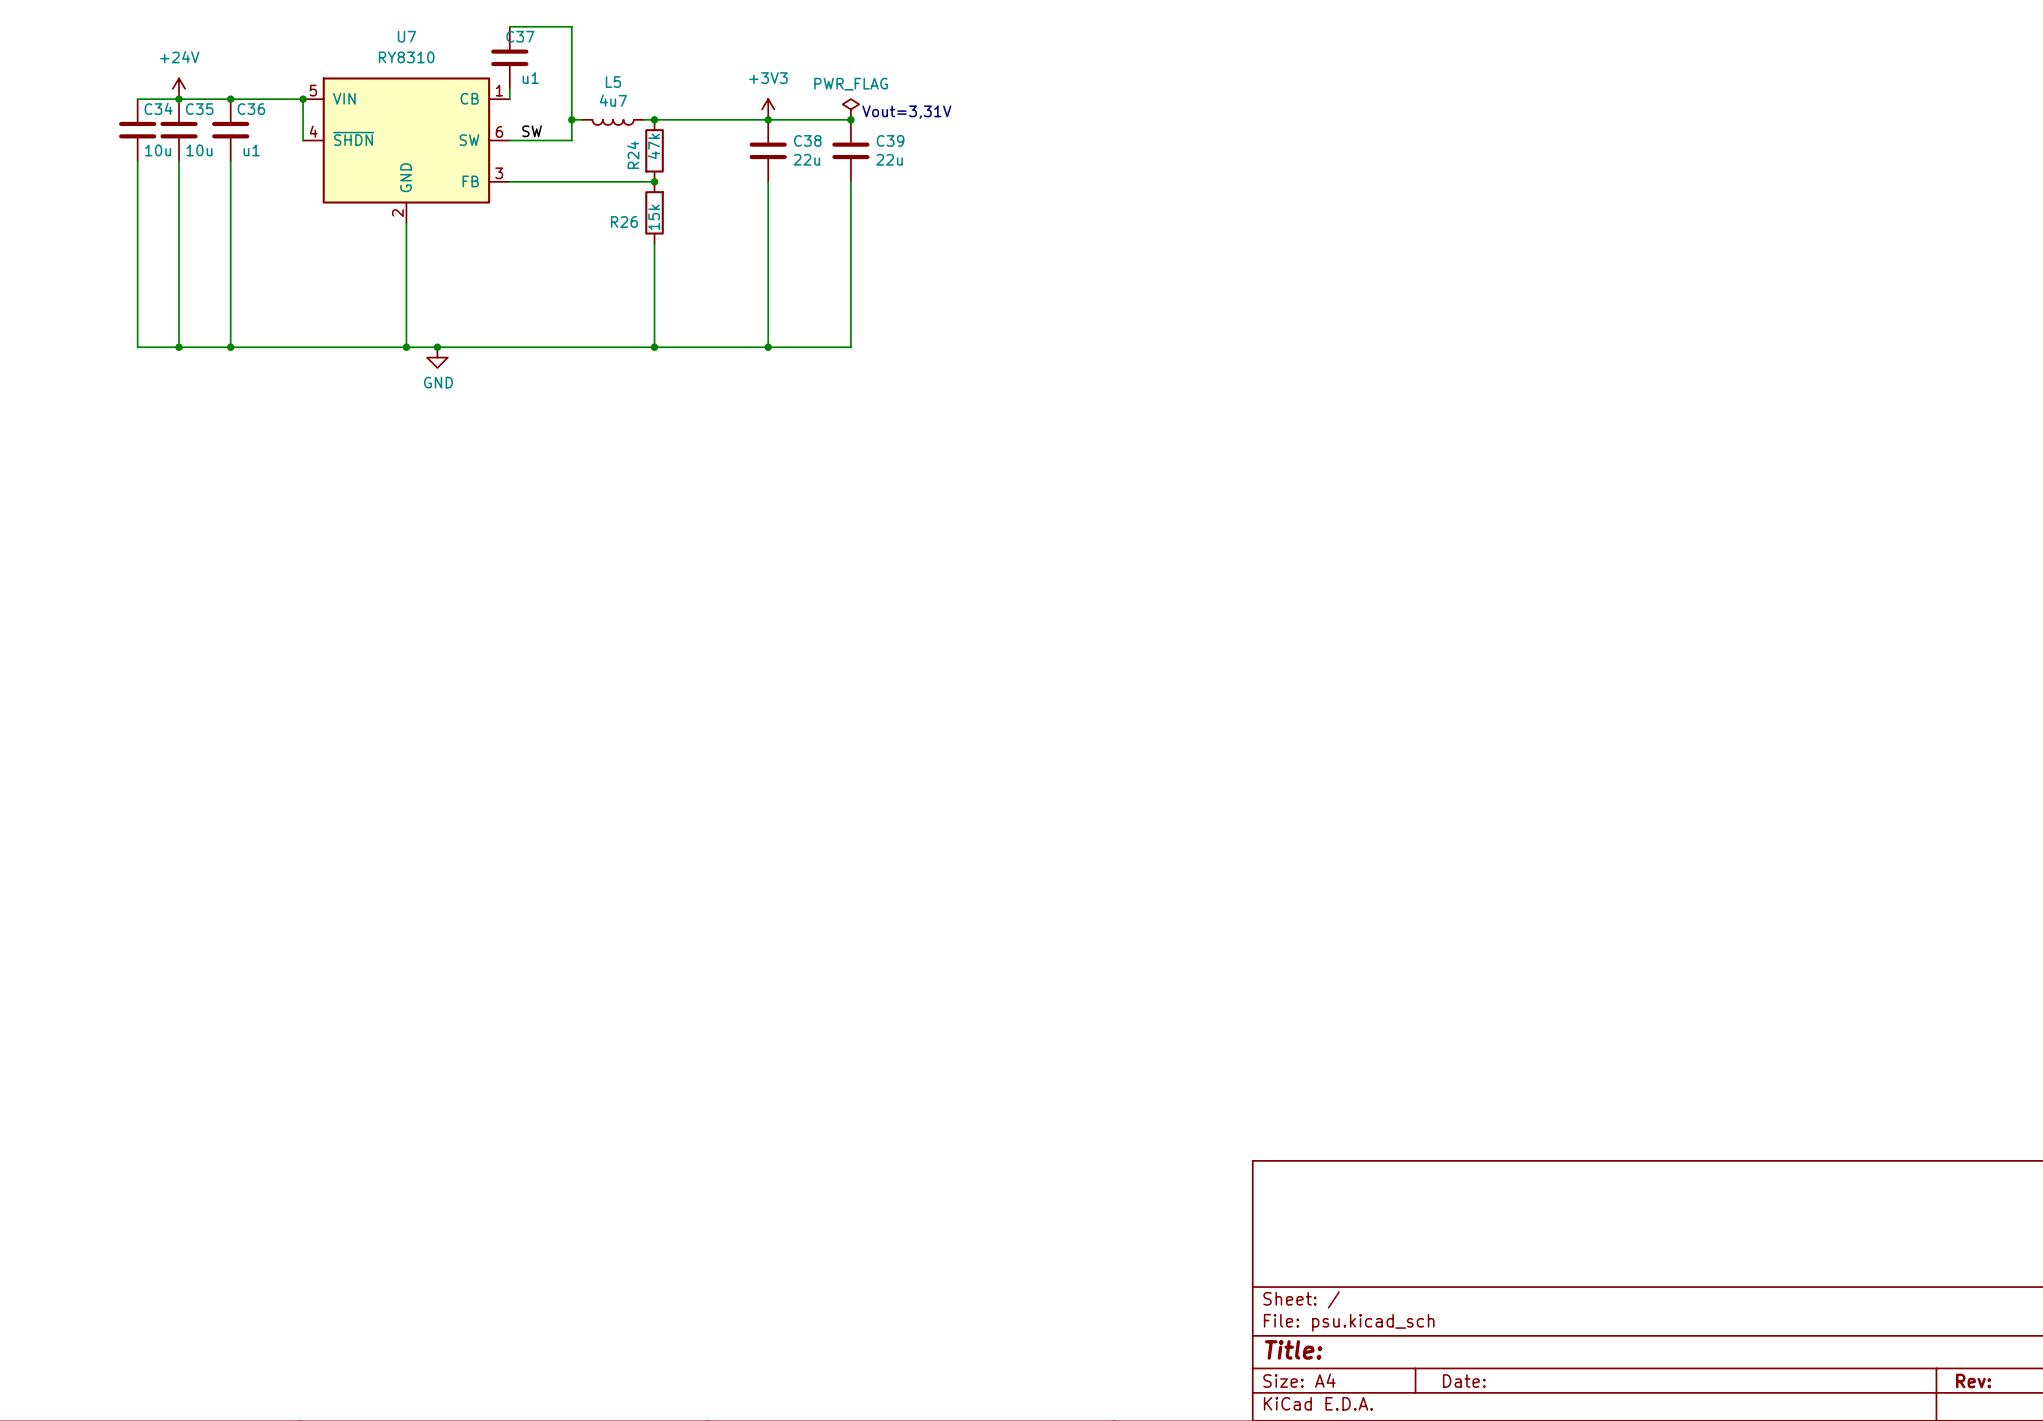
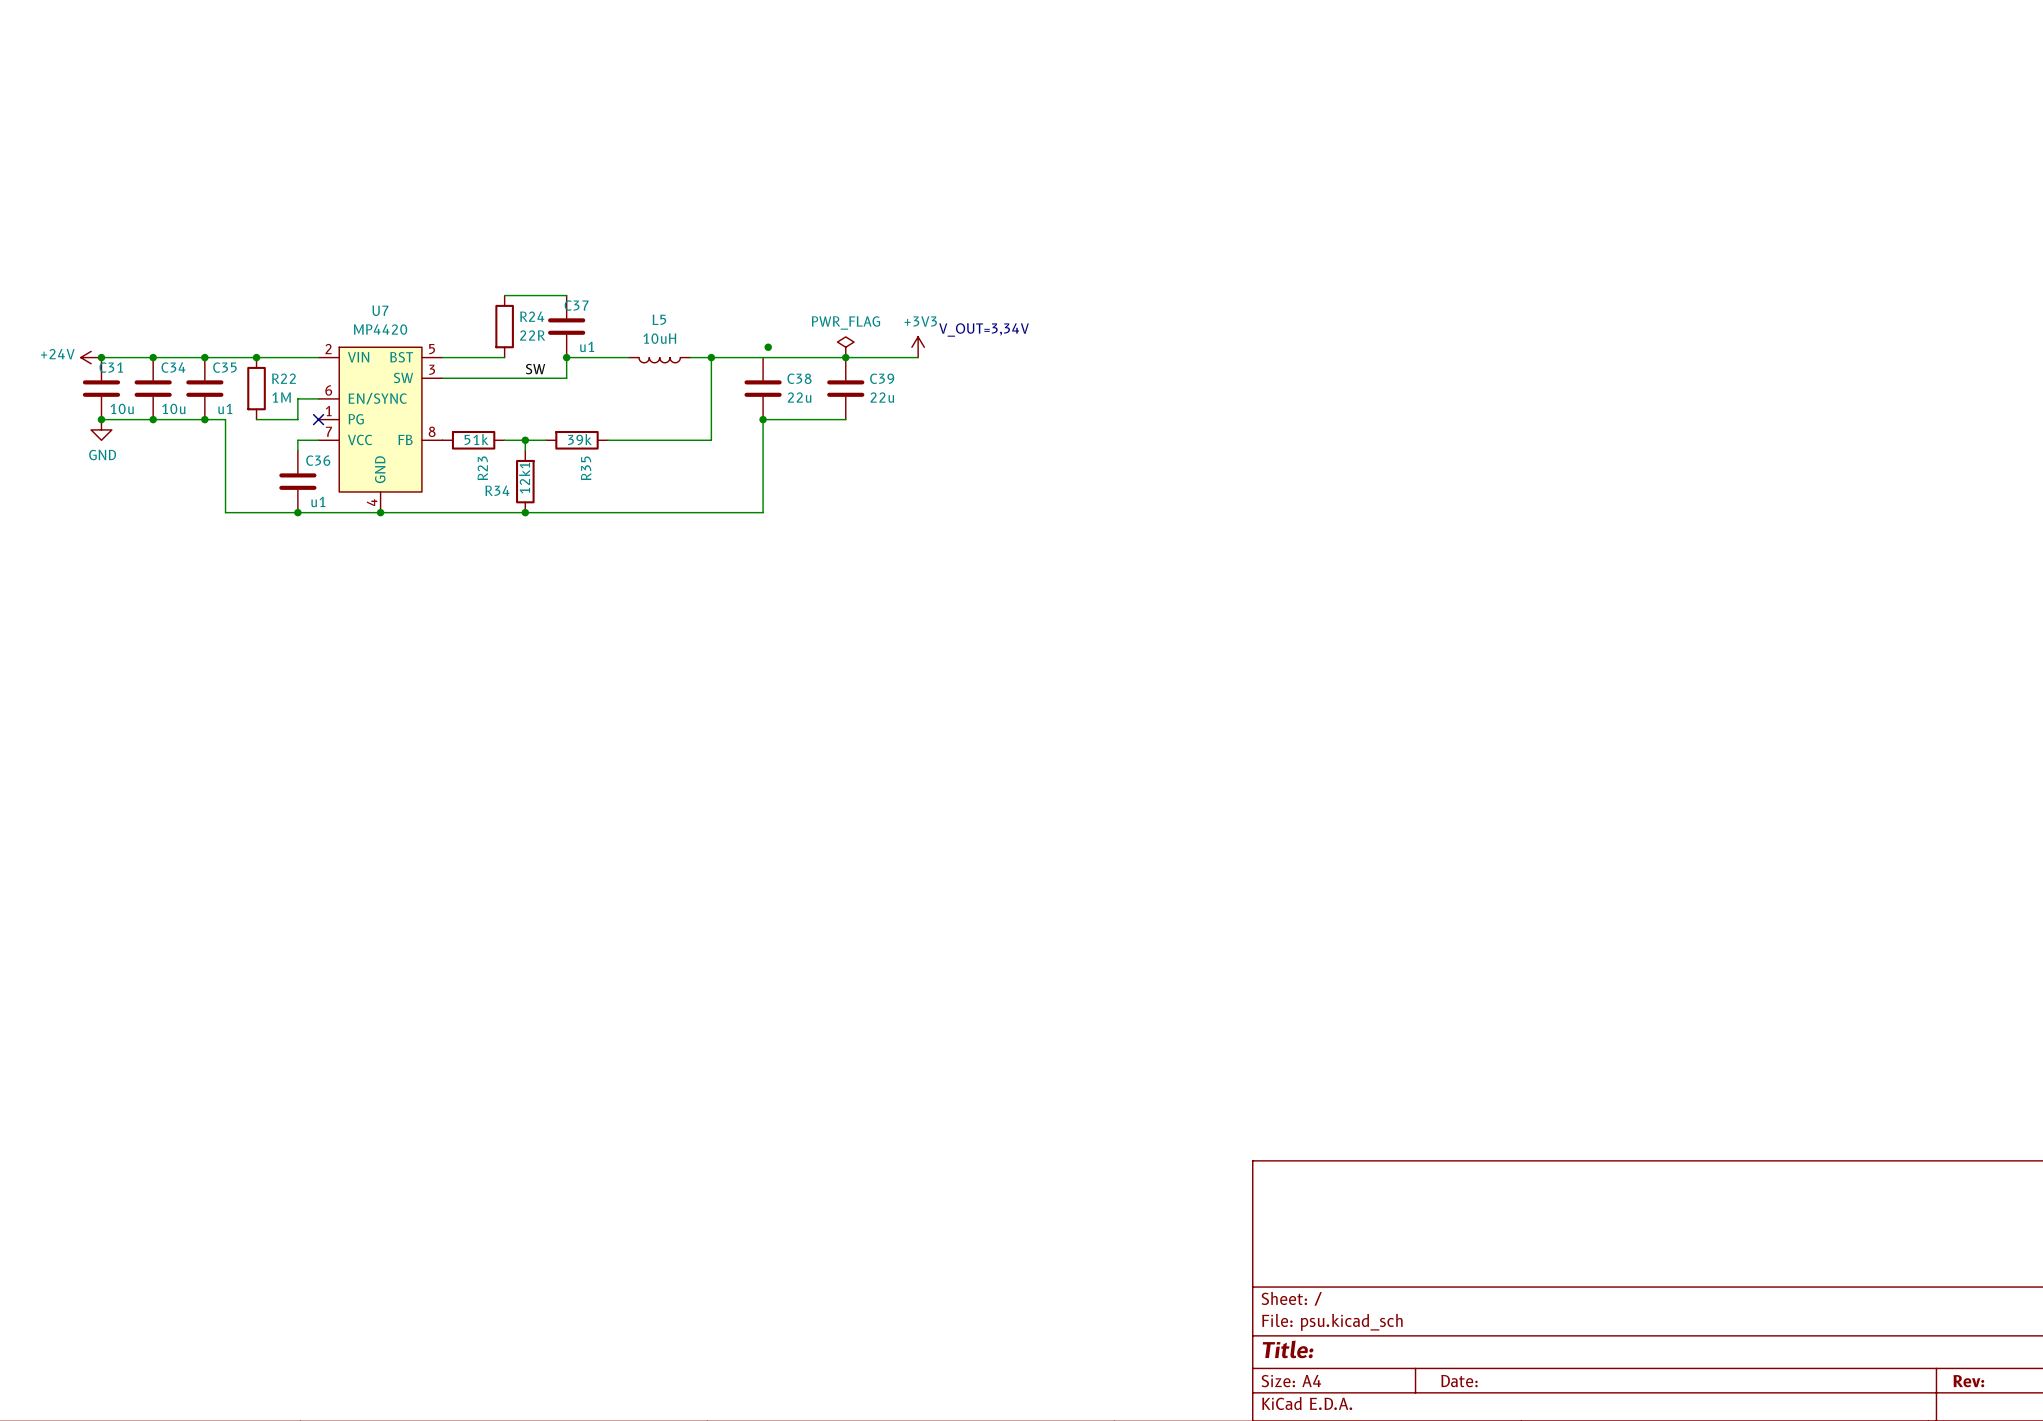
wire: (509, 26) (571, 26) (571, 140) (509, 140) -> none
U7 value: RY8310 (406, 57) -> MP4420 (380, 329)
C37 position: (509, 57) -> (566, 326)
U7 symbol: [303, 77, 510, 224] -> [318, 347, 443, 513]
power symbol: +24V (179, 88) -> none
wire: (509, 88) (509, 99) -> none
wire: (137, 99) (303, 99) (303, 140) -> none
junction: (179, 99) -> none
junction: (230, 99) -> none
junction: (303, 99) -> none
L5 value: 4u7 (613, 100) -> 10uH (659, 338)
power symbol: +3V3 (768, 109) -> none
power symbol: PWR_FLAG (850, 109) -> none
text: Vout=3,31V (906, 112) -> none
wire: (571, 119) (582, 119) -> none
junction: (571, 119) -> none
wire: (644, 119) (850, 119) -> none
junction: (654, 119) -> none
junction: (768, 119) -> none
junction: (850, 119) -> none
L5 position: (613, 122) -> (659, 360)
C34 position: (137, 130) -> (153, 388)
C35 position: (179, 130) -> (204, 388)
C36 position: (230, 130) -> (297, 481)
label: SW (532, 131) -> none
R24 value: 47k (653, 146) -> 22R (532, 335)
C35 value: 10u (199, 150) -> u1 (225, 408)
R24 position: (654, 150) -> (504, 326)
C38 position: (768, 150) -> (763, 388)
C39 position: (850, 150) -> (845, 388)
R24 name rotation: 0° (633, 155) -> 90° clockwise (532, 316)
R24 name position: R24 (633, 155) -> R24 (532, 316)
wire: (137, 161) (137, 347) (850, 347) (850, 181) -> none
wire: (179, 161) (179, 347) -> none
wire: (230, 161) (230, 347) -> none
wire: (509, 181) (654, 181) -> none
junction: (654, 181) -> none
wire: (768, 181) (768, 347) -> none
R26: 15k (654, 212) -> none
wire: (406, 223) (406, 347) -> none
wire: (654, 243) (654, 347) -> none
wire: none -> (504, 295) (566, 295)
text: none -> V_OUT=3,34V (984, 329)
junction: (179, 347) -> none
junction: (230, 347) -> none
junction: (406, 347) -> none
junction: (437, 347) -> none
junction: (654, 347) -> none
power symbol: none -> PWR_FLAG (845, 347)
power symbol: none -> +3V3 (918, 347)
power symbol: none -> +24V (91, 357)
wire: none -> (101, 357) (318, 357)
junction: none -> (101, 357)
junction: none -> (153, 357)
junction: none -> (204, 357)
junction: none -> (256, 357)
power symbol: GND (437, 357) -> none
wire: none -> (442, 357) (504, 357)
junction: none -> (566, 357)
wire: none -> (628, 357) (566, 357) (566, 378) (442, 378)
wire: none -> (690, 357) (918, 357)
wire: none -> (711, 357) (711, 440) (608, 440)
junction: none -> (711, 357)
junction: none -> (845, 357)
label: none -> SW (535, 369)
C31: none -> 10u (101, 388)
R22: none -> 1M (256, 388)
wire: none -> (318, 398) (297, 398) (297, 419) (256, 419)
wire: none -> (101, 419) (225, 419) (225, 512) (763, 512) (763, 419) (845, 419)
junction: none -> (101, 419)
junction: none -> (153, 419)
junction: none -> (204, 419)
no-connect mark: none -> (318, 419)
junction: none -> (763, 419)
power symbol: none -> GND (101, 429)
wire: none -> (318, 440) (297, 440) (297, 450)
R23: none -> 51k (473, 440)
wire: none -> (504, 440) (545, 440)
wire: none -> (525, 440) (525, 450)
junction: none -> (525, 440)
R35: none -> 39k (576, 440)
R34: none -> 12k1 (525, 481)
junction: none -> (297, 512)
junction: none -> (380, 512)
junction: none -> (525, 512)

